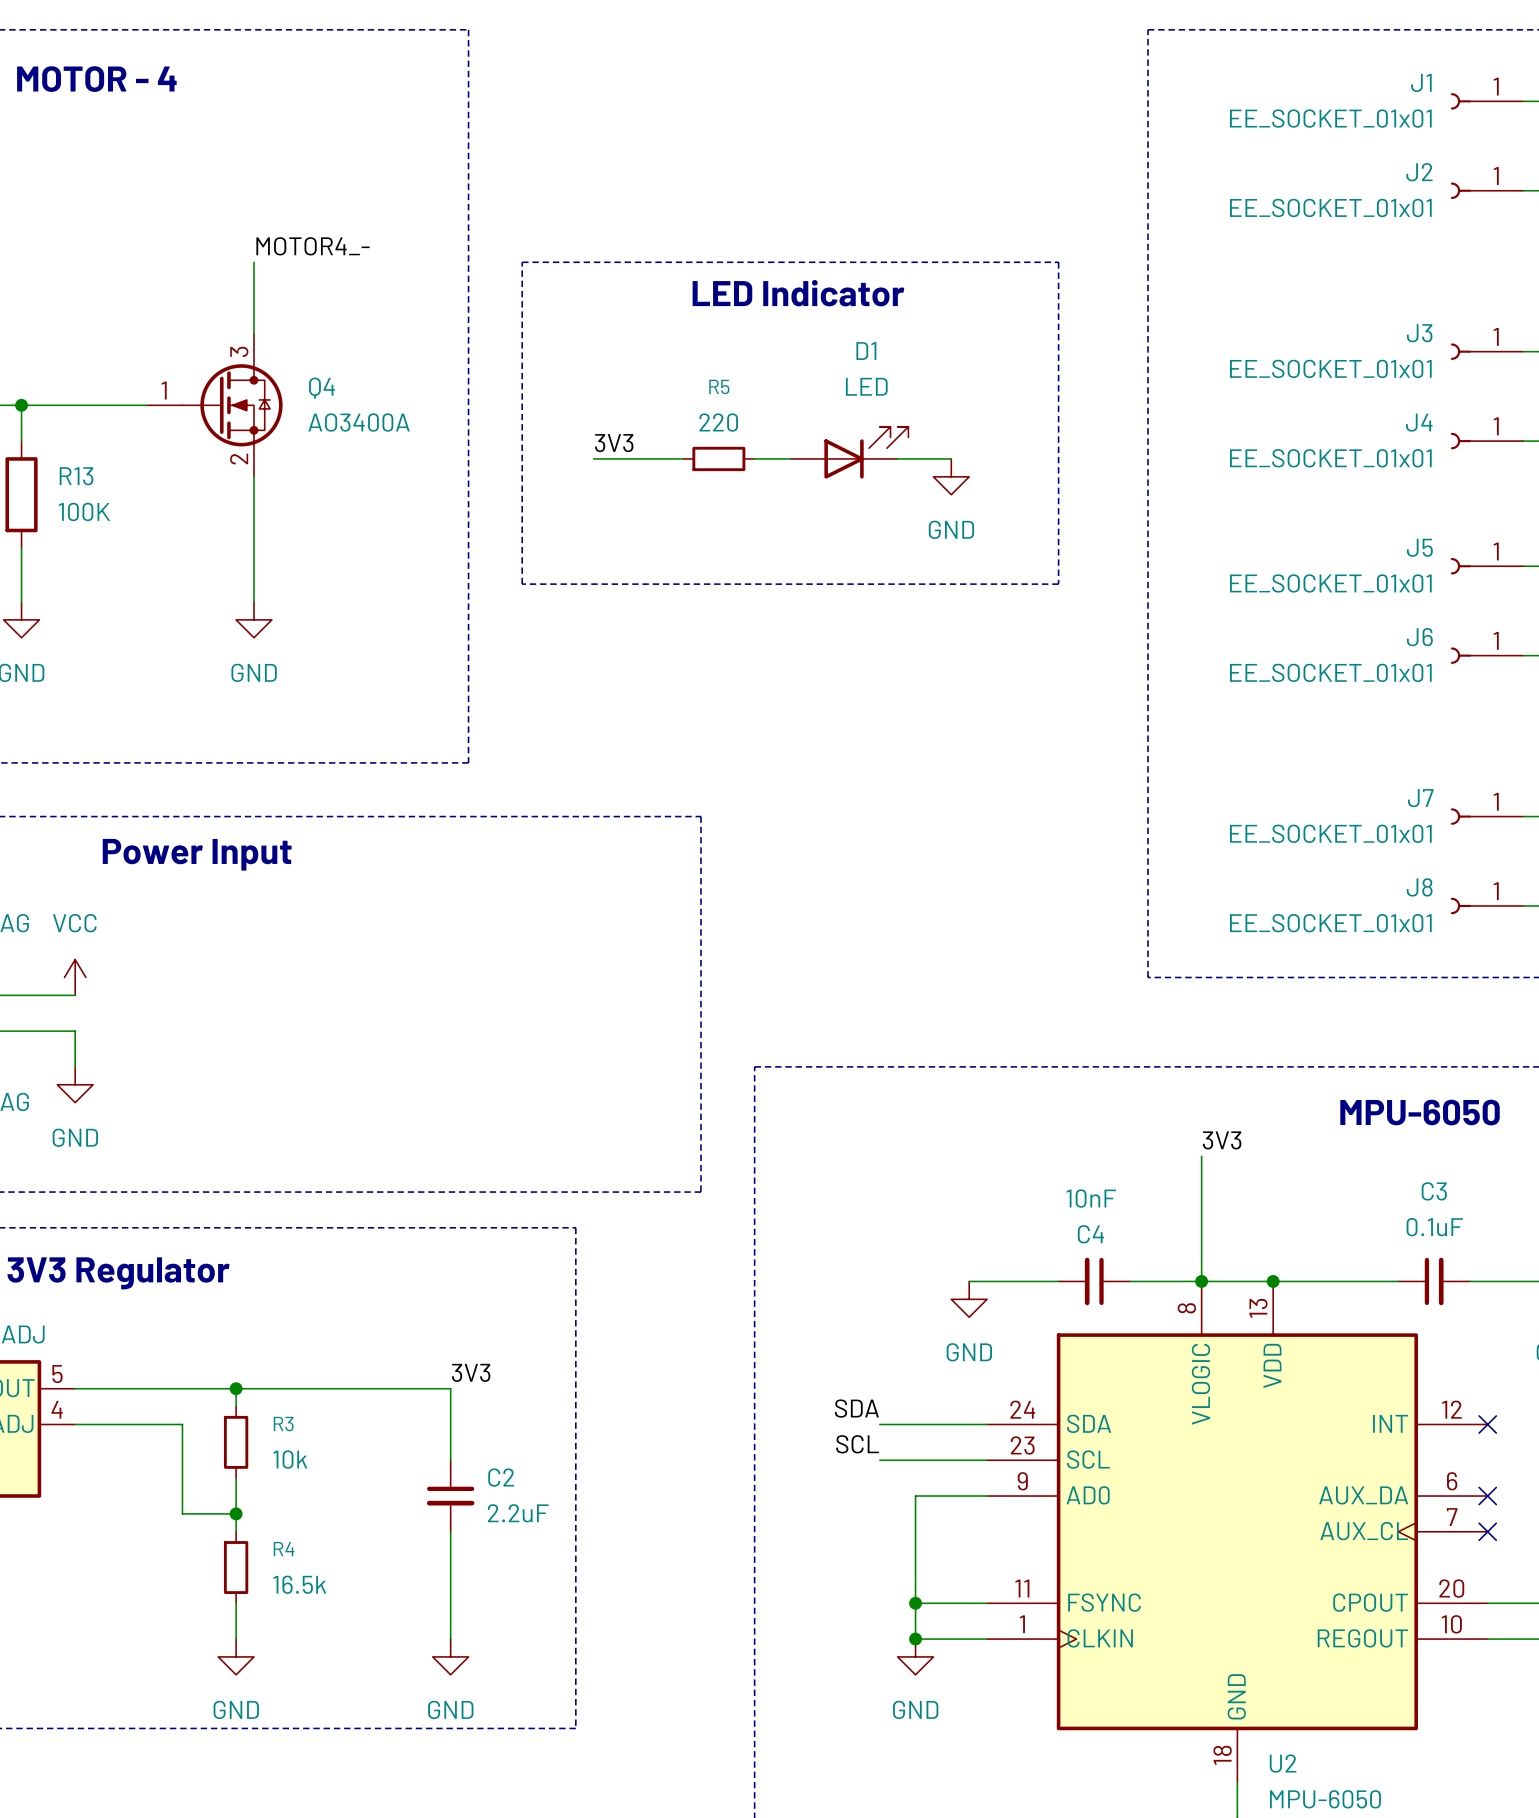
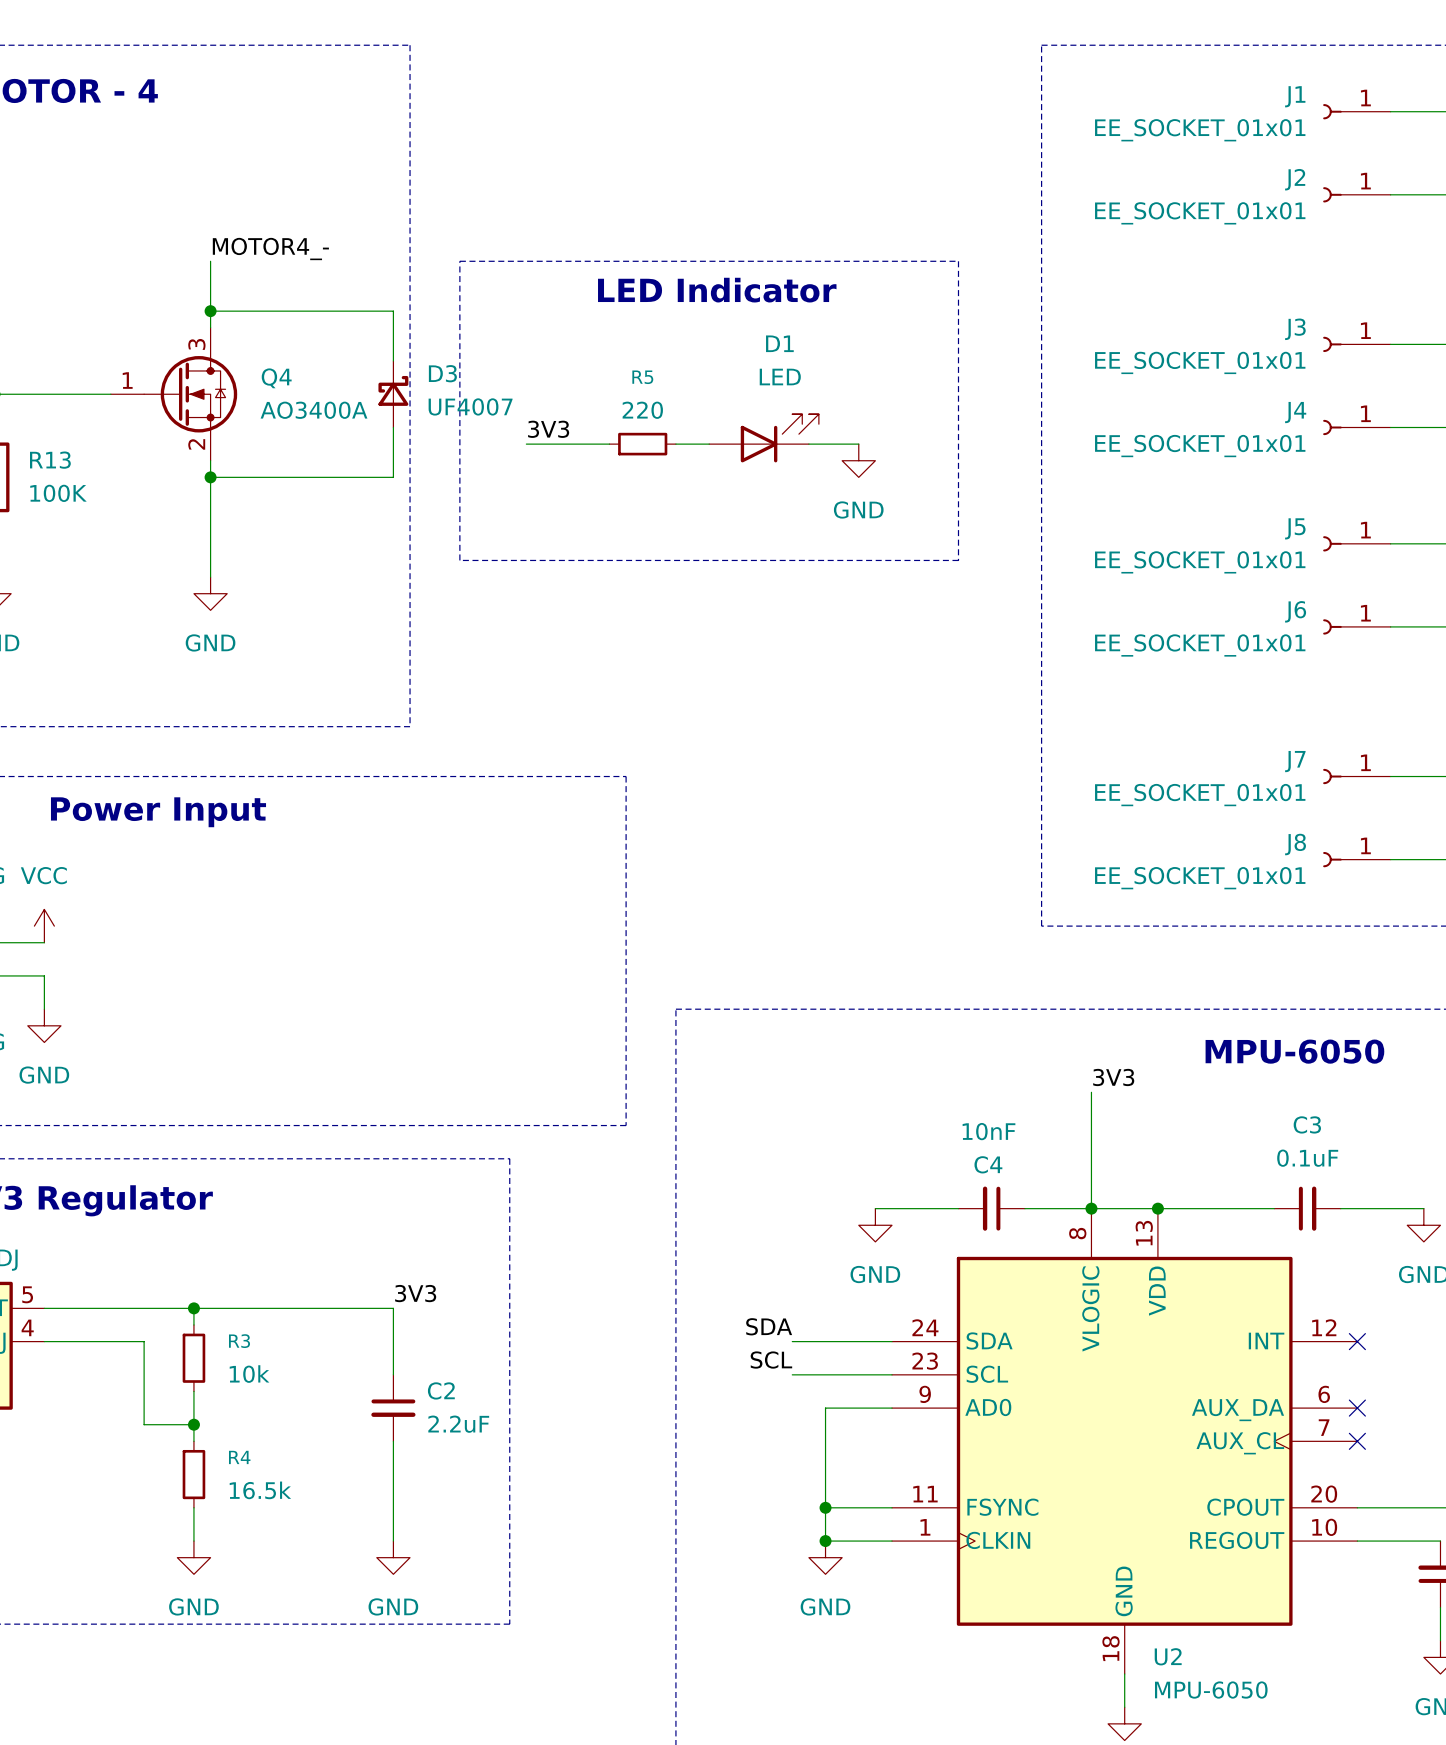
wire: none -> (210, 311) (393, 311) (393, 361)
junction: none -> (210, 311)
D3: none -> UF4007 (393, 394)
wire: none -> (393, 427) (393, 477) (210, 477)
junction: none -> (210, 477)

